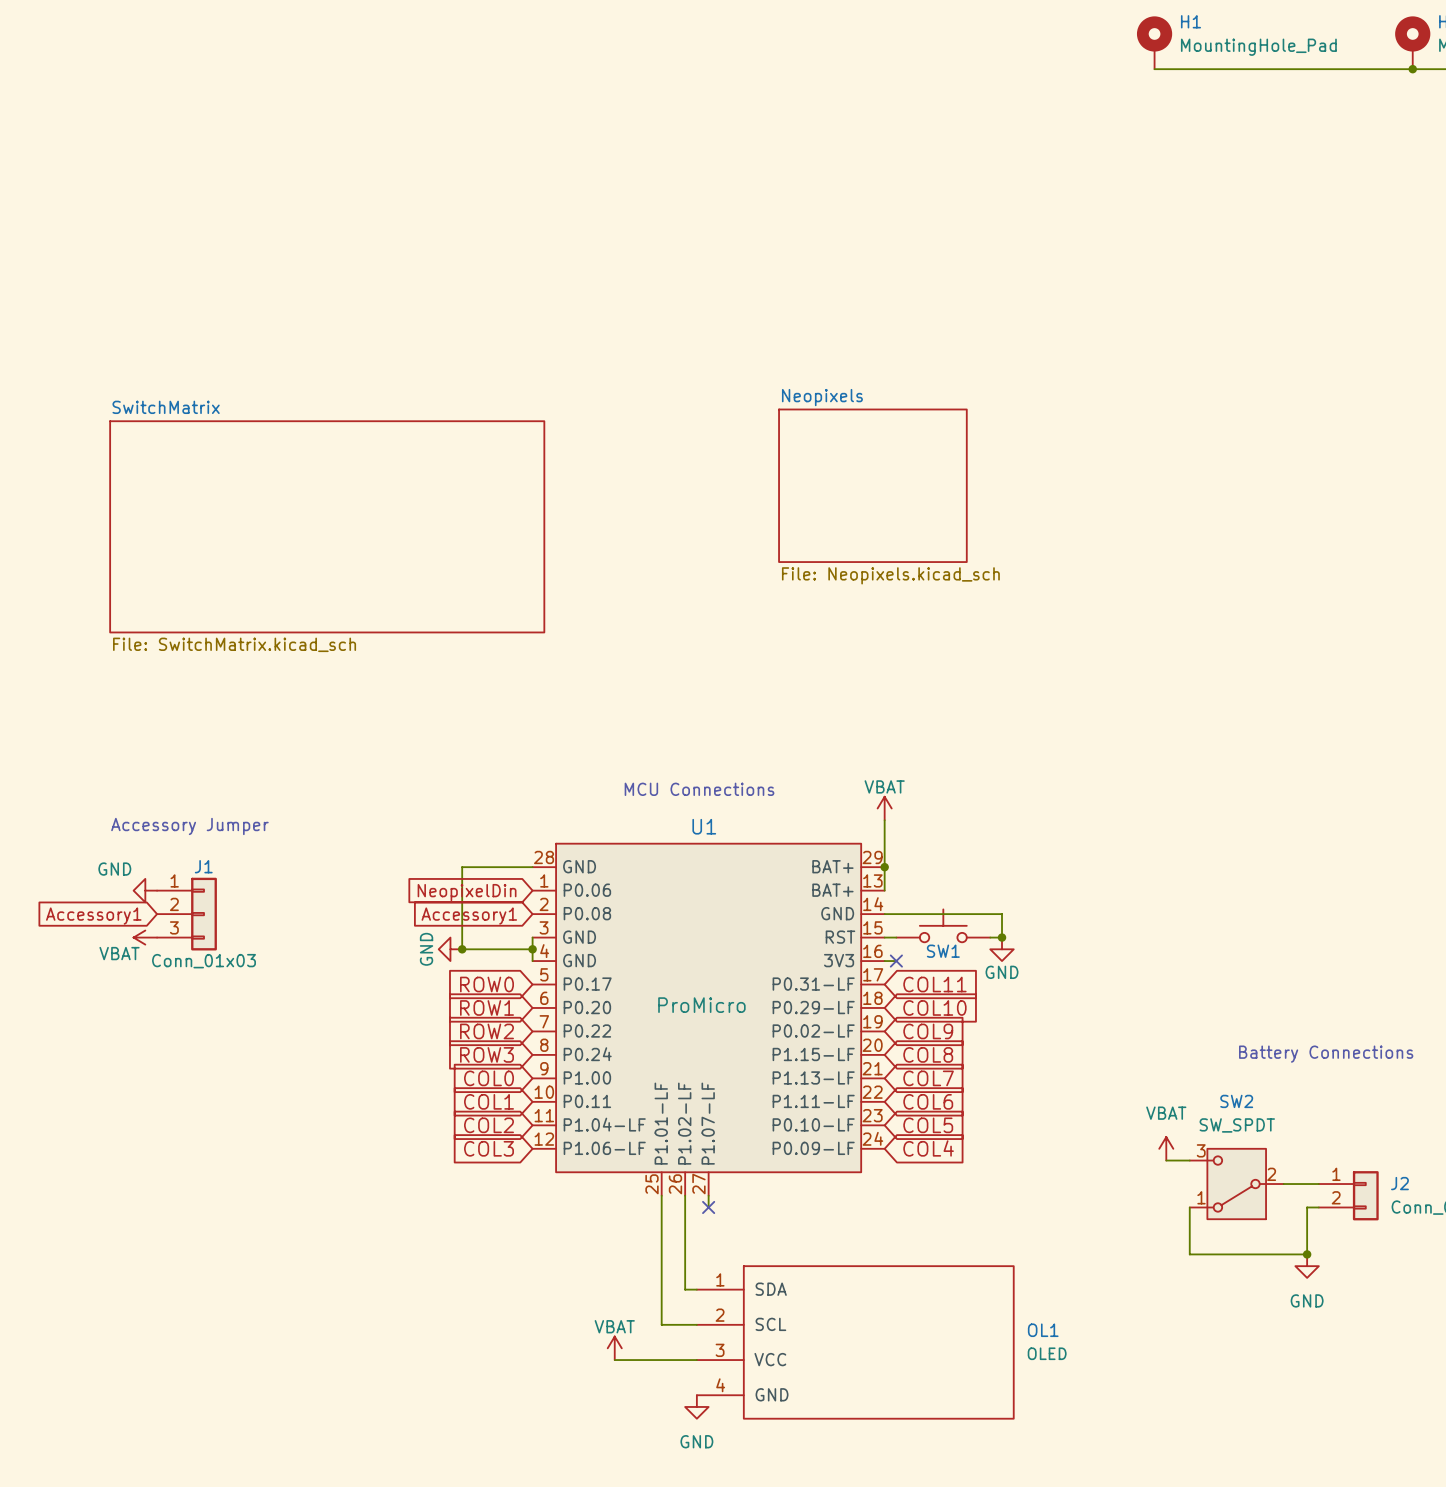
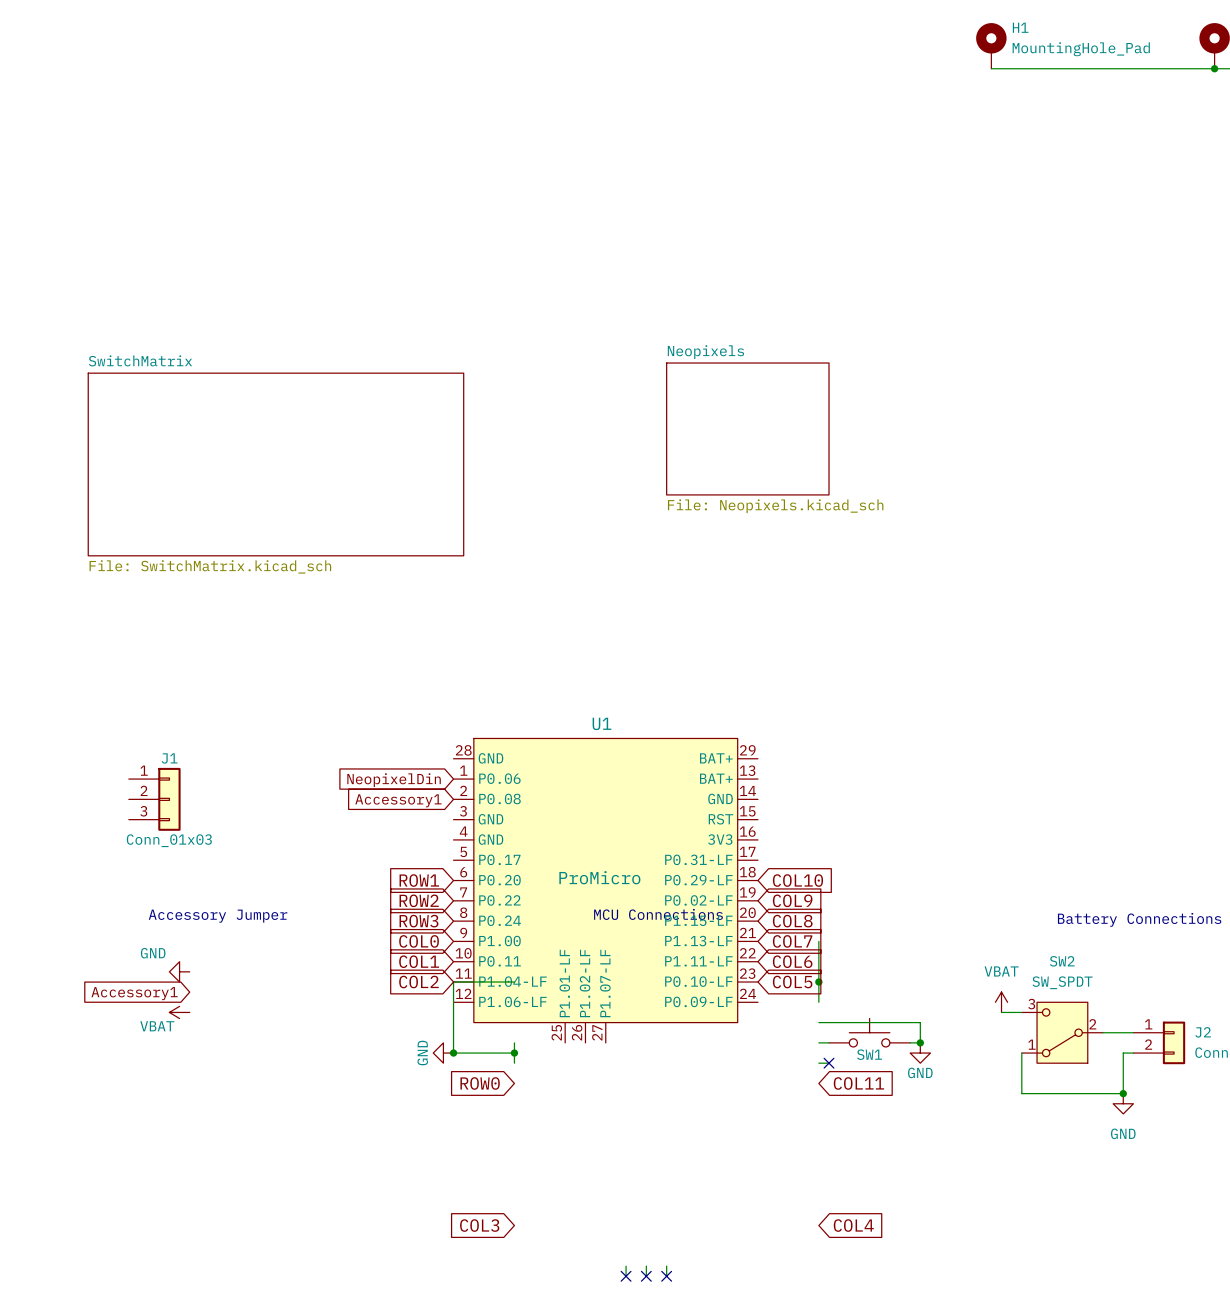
text: MCU Connections (699, 789) -> none
power symbol: VBAT (884, 808) -> none
wire: (884, 820) (884, 890) -> none
text: Accessory Jumper (189, 826) -> none
wire: (532, 867) (462, 867) (462, 949) (532, 949) -> none
junction: (884, 867) -> none
power symbol: GND (145, 890) -> none
wire: (884, 914) (1002, 914) (1002, 937) (990, 937) -> none
global label: Accessory1 (93, 916) -> none
SW1 position: (943, 925) -> (869, 1032)
power symbol: VBAT (145, 937) -> none
wire: (532, 937) (532, 961) -> none
wire: (884, 937) (896, 937) -> none
junction: (1002, 937) -> none
power symbol: GND (450, 949) -> none
junction: (462, 949) -> none
junction: (532, 949) -> none
power symbol: GND (1002, 949) -> none
wire: (884, 961) (896, 961) -> none
no-connect mark: (896, 961) -> none
global label: ROW0 (486, 984) -> none
global label: COL11 (934, 984) -> none
text: none -> MCU Connections (658, 914)
text: none -> Accessory Jumper (218, 916)
wire: none -> (818, 941) (818, 1002)
power symbol: none -> GND (179, 971)
wire: none -> (514, 982) (453, 982) (453, 1053) (514, 1053)
junction: none -> (818, 982)
global label: none -> Accessory1 (134, 993)
global label: COL3 (489, 1148) -> none
global label: COL4 (928, 1148) -> none
power symbol: none -> VBAT (179, 1012)
wire: none -> (818, 1022) (920, 1022) (920, 1042) (910, 1042)
wire: none -> (514, 1042) (514, 1063)
wire: (661, 1195) (661, 1324) (696, 1324) -> none
wire: (685, 1195) (685, 1289) (696, 1289) -> none
wire: (708, 1195) (708, 1207) -> none
wire: none -> (818, 1042) (829, 1042)
junction: none -> (920, 1042)
power symbol: none -> GND (443, 1053)
junction: none -> (453, 1053)
junction: none -> (514, 1053)
no-connect mark: (708, 1207) -> none
power symbol: none -> GND (920, 1053)
wire: none -> (818, 1063) (829, 1063)
no-connect mark: none -> (829, 1063)
global label: none -> ROW0 (480, 1083)
global label: none -> COL11 (858, 1083)
OL1: OLED (855, 1342) -> none
power symbol: VBAT (614, 1348) -> none
wire: (614, 1360) (696, 1360) -> none
global label: none -> COL3 (479, 1225)
power symbol: GND (696, 1406) -> none
global label: none -> COL4 (853, 1225)
wire: none -> (626, 1266) (626, 1276)
wire: none -> (646, 1266) (646, 1276)
wire: none -> (666, 1266) (666, 1276)
no-connect mark: none -> (626, 1276)
no-connect mark: none -> (646, 1276)
no-connect mark: none -> (666, 1276)

